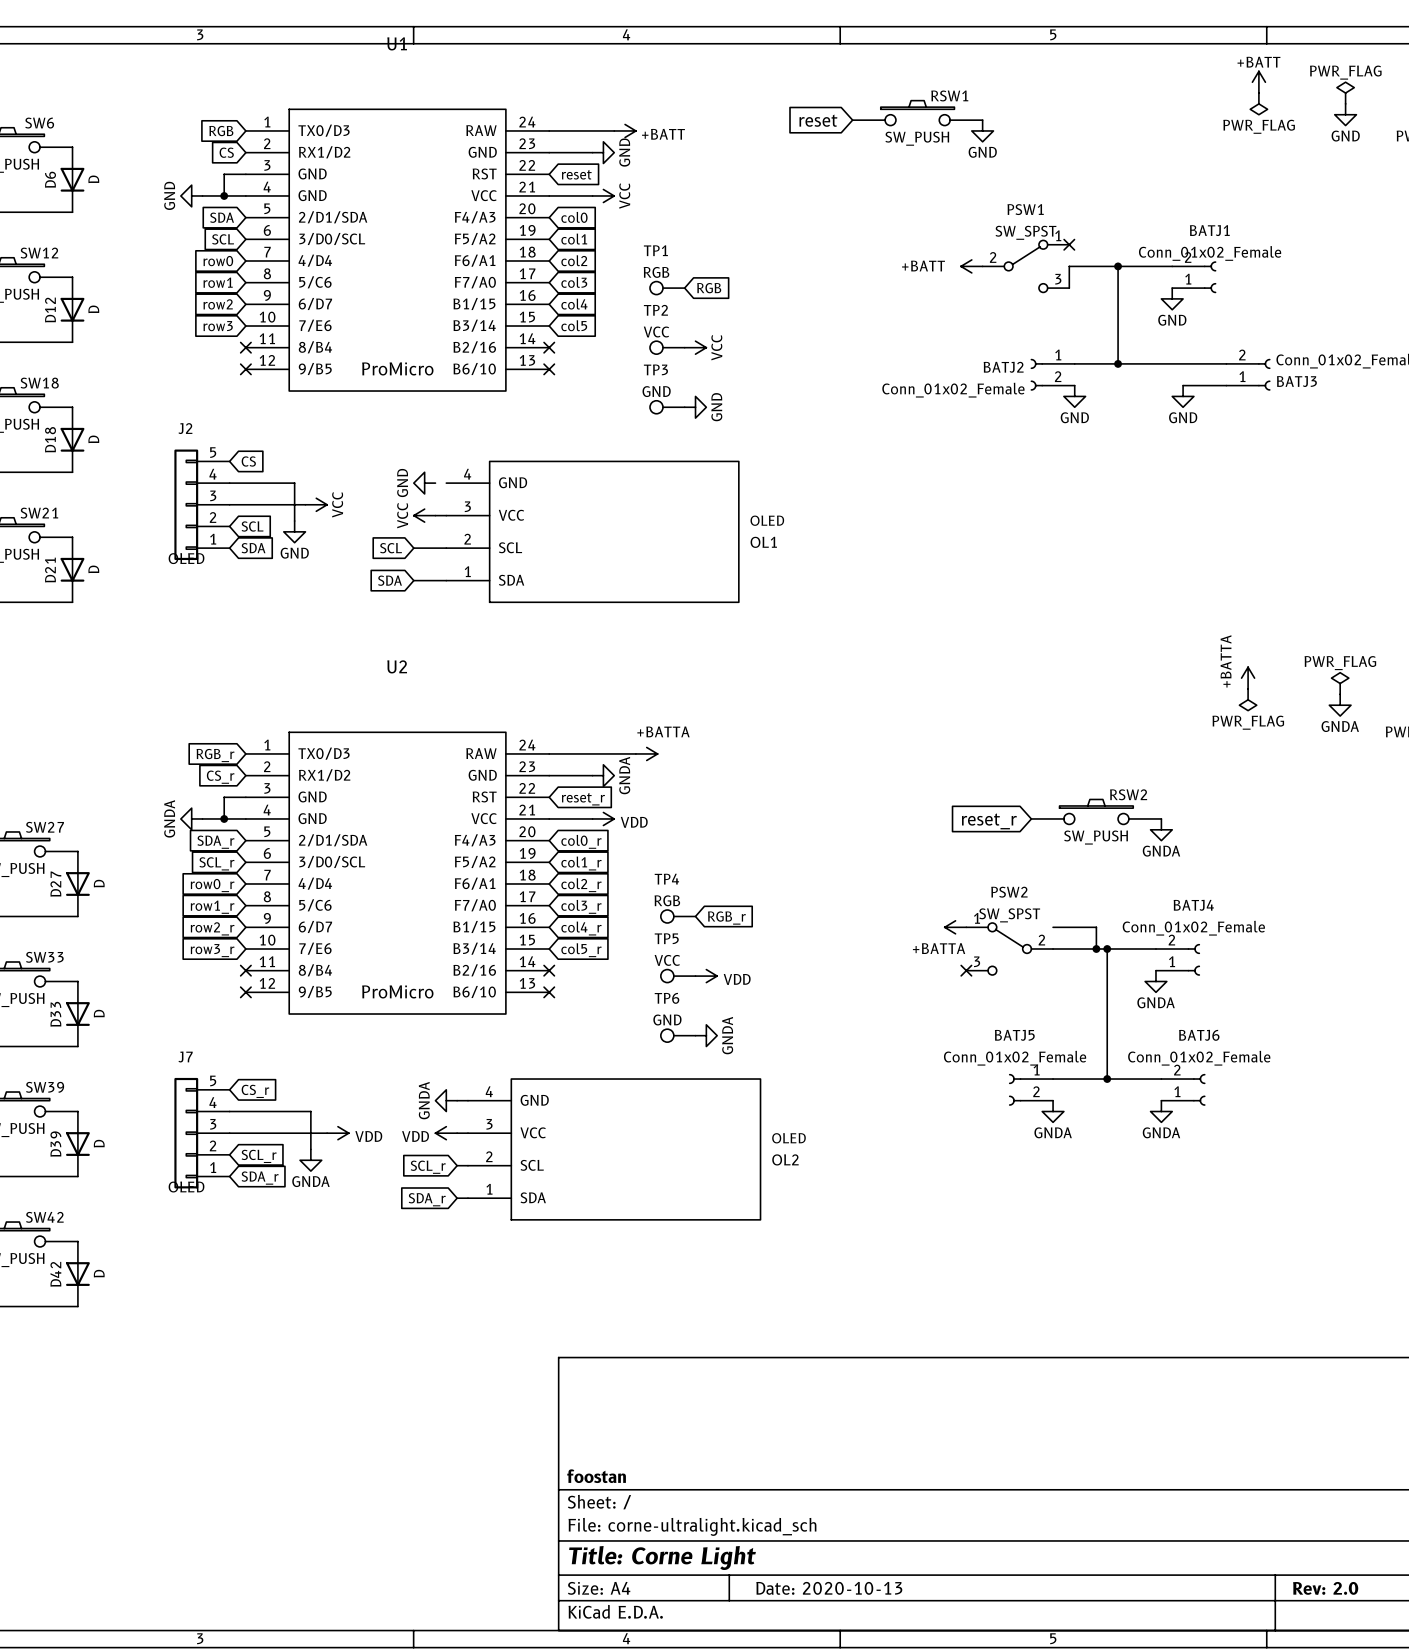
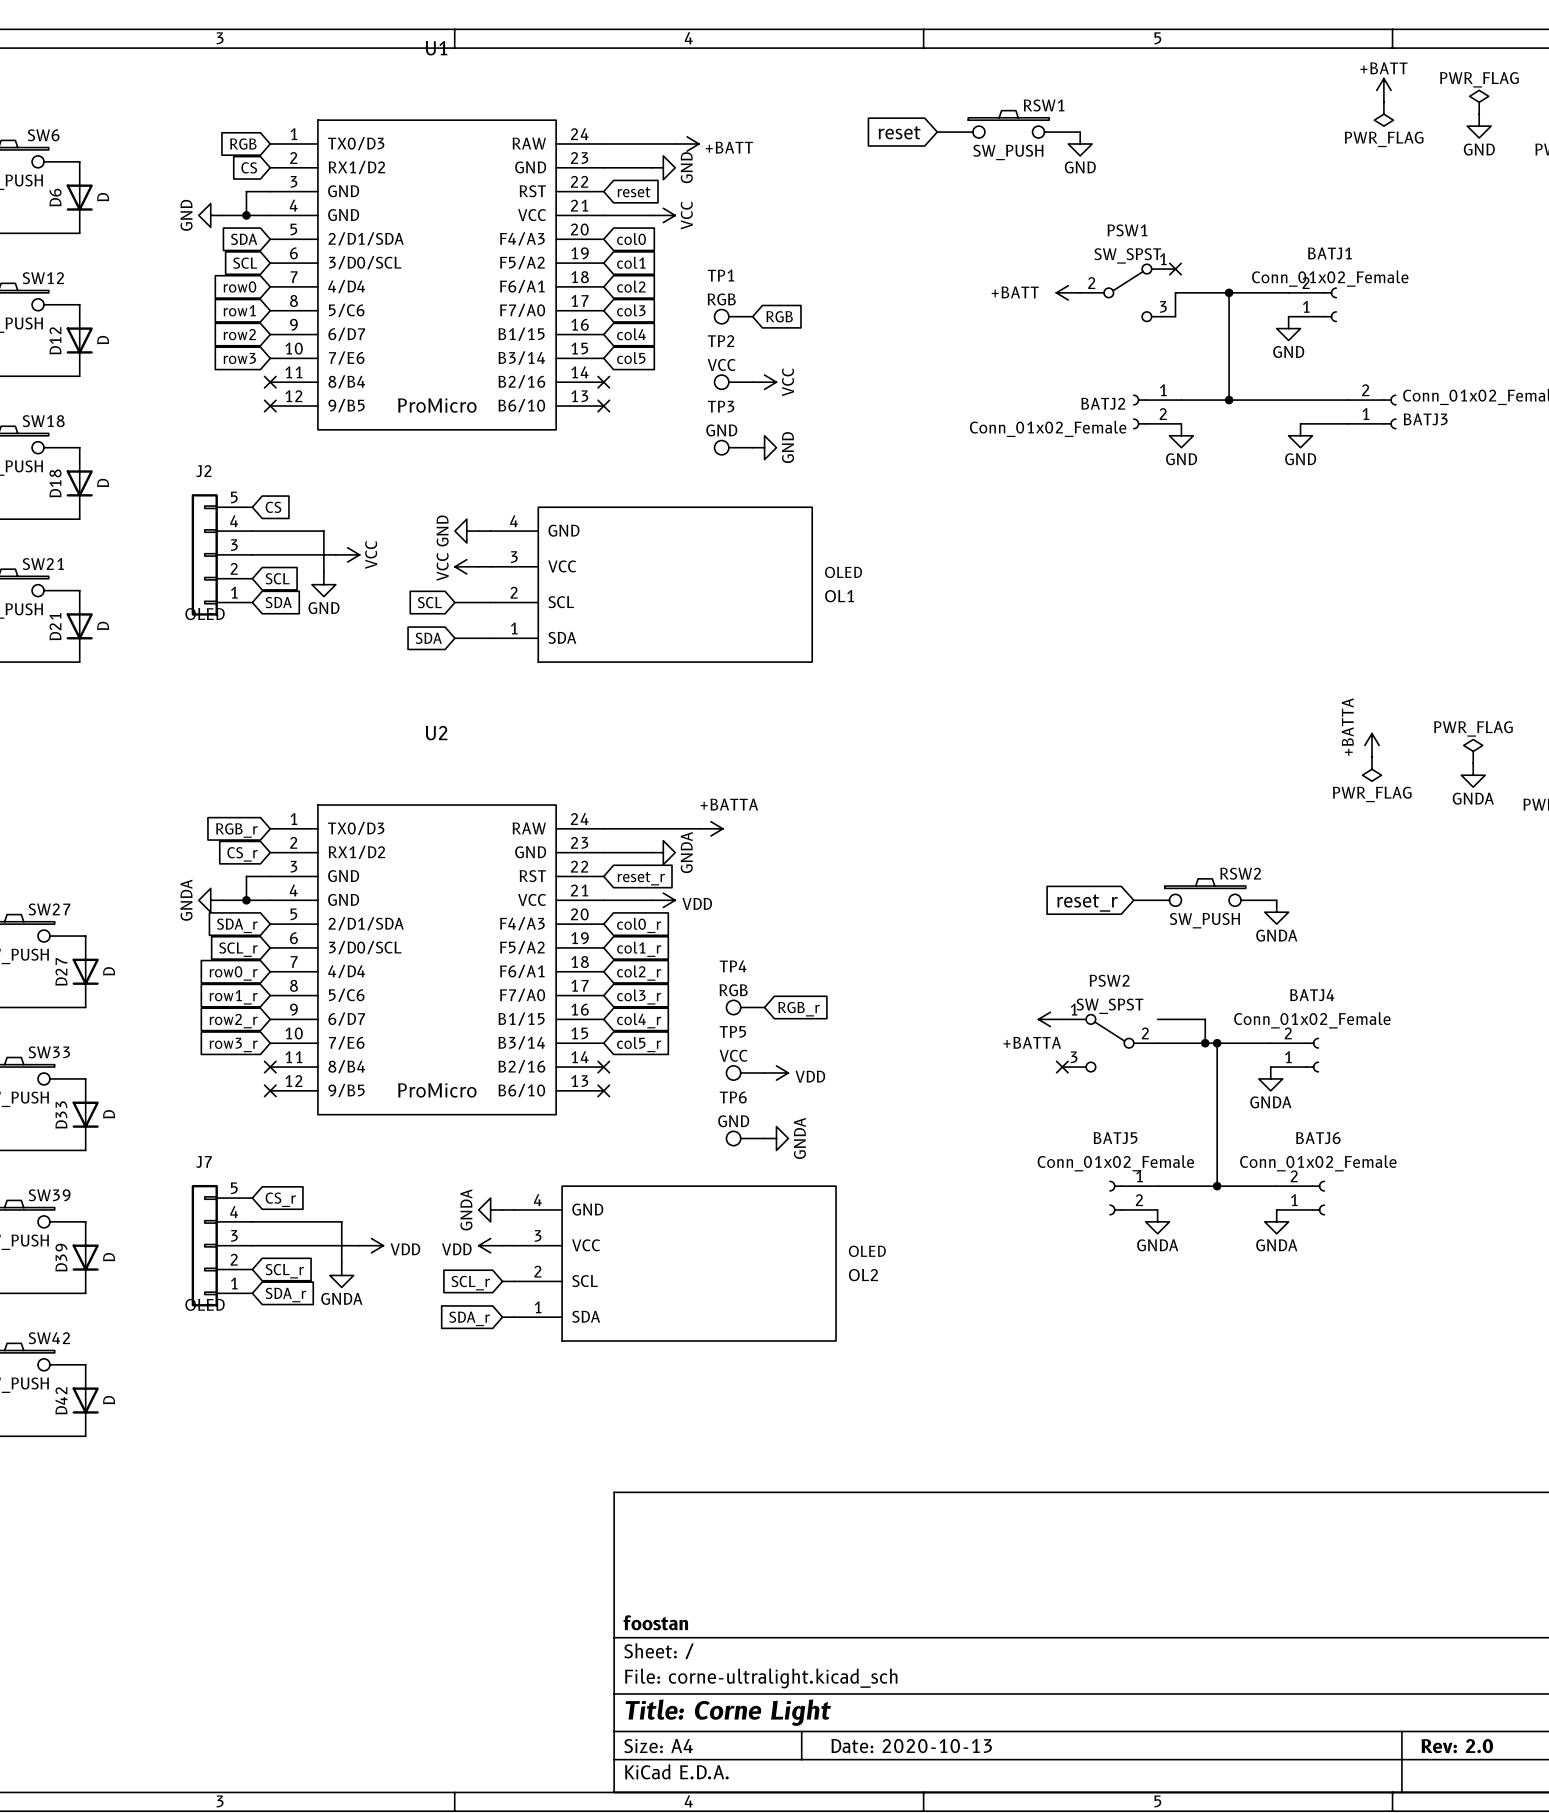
wire: none -> (478, 531) (490, 531)

